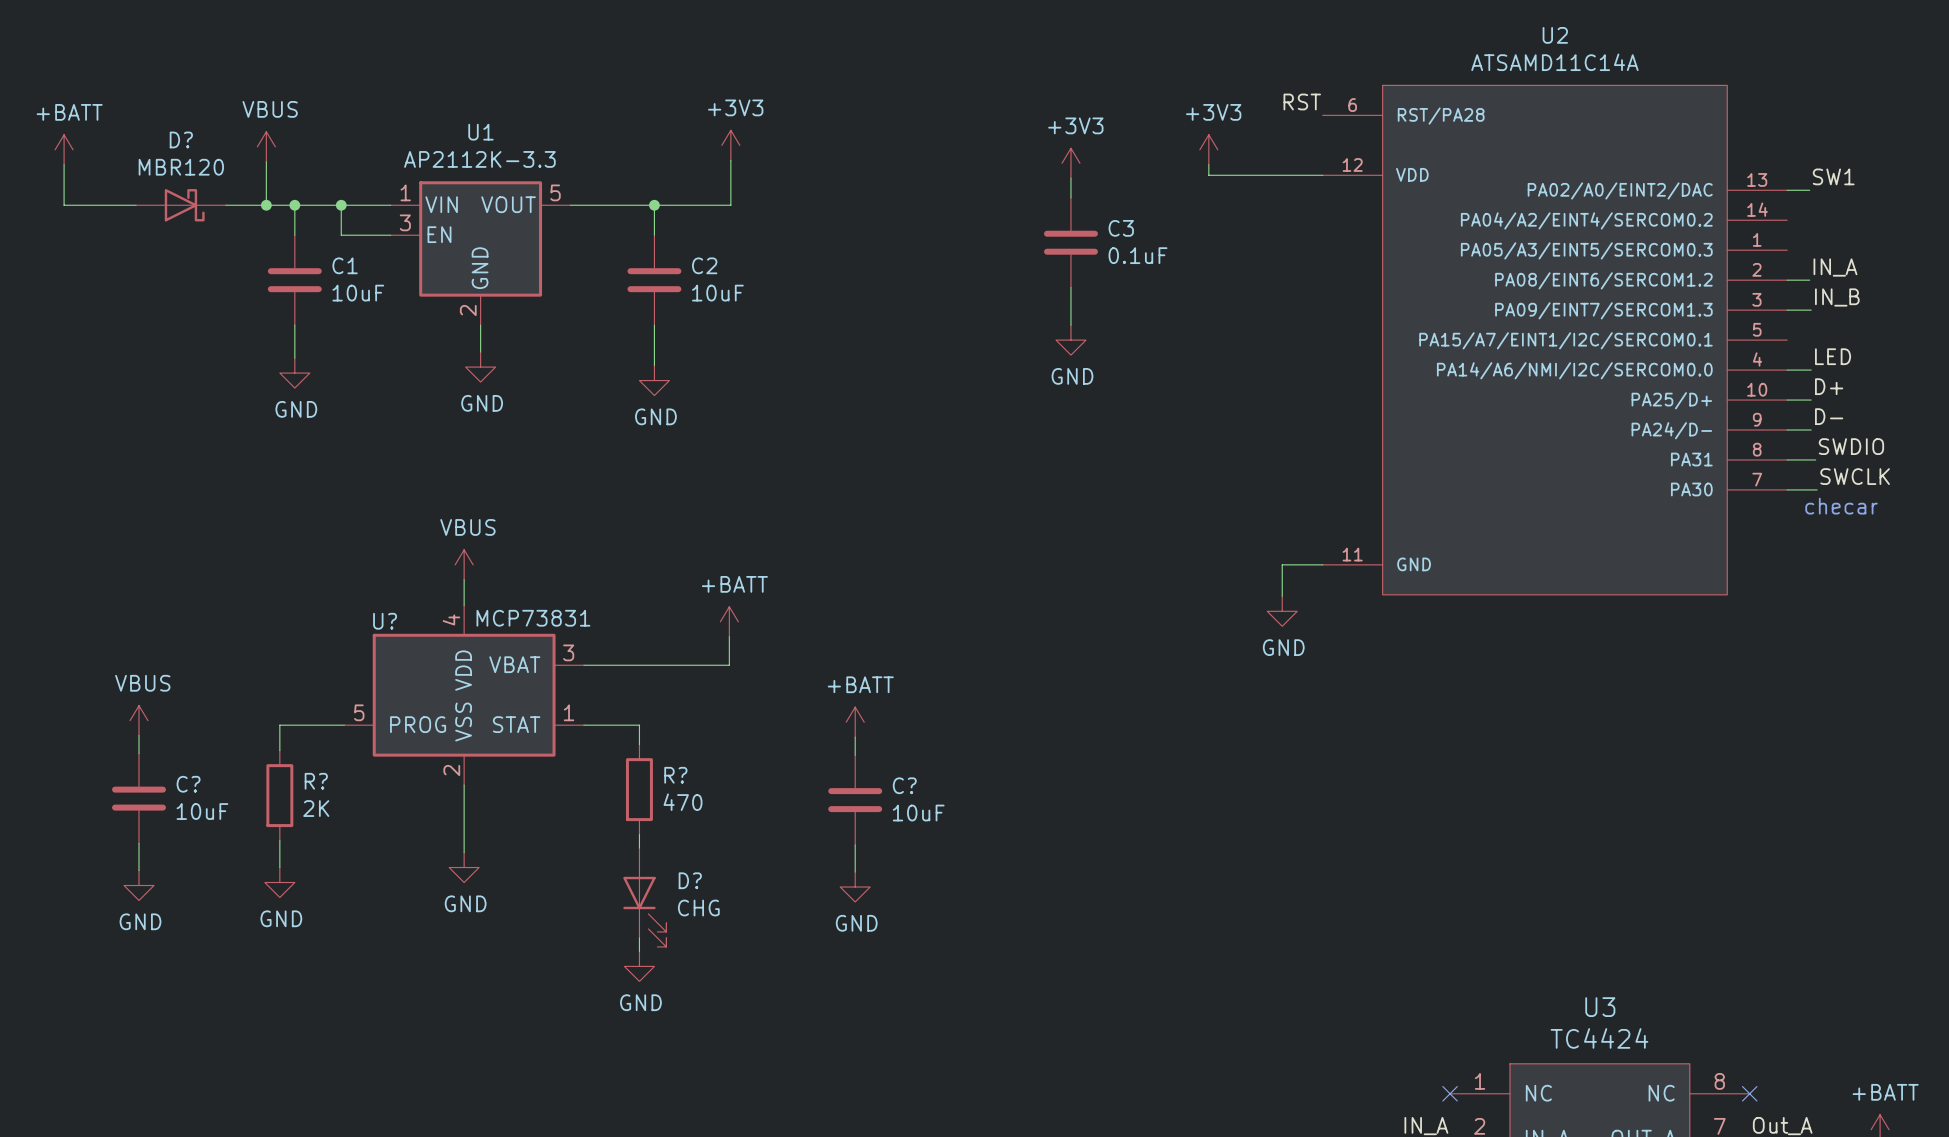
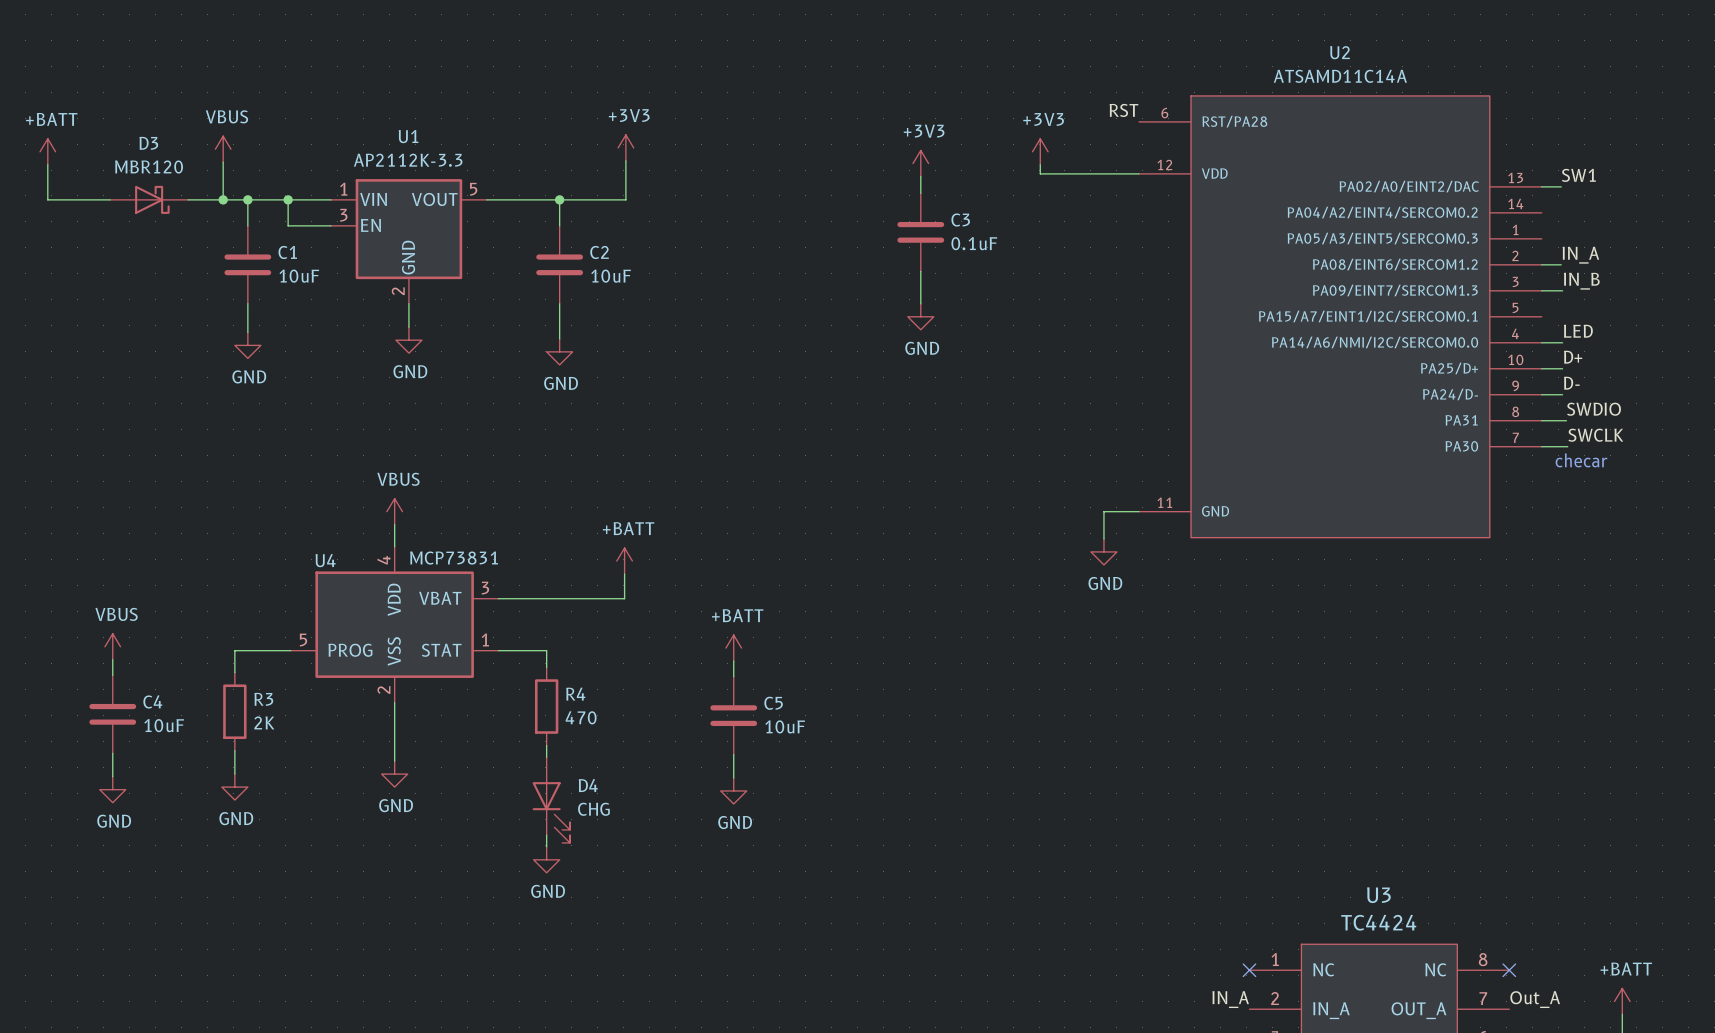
D? name: D? (181, 139) -> D3 (148, 143)
U? name: U? (385, 621) -> U4 (325, 560)
R? name: R? (675, 775) -> R4 (575, 694)
R? name: R? (316, 781) -> R3 (263, 699)
C? name: C? (188, 784) -> C4 (152, 701)
C? name: C? (904, 785) -> C5 (773, 703)
D? name: D? (690, 880) -> D4 (588, 785)

